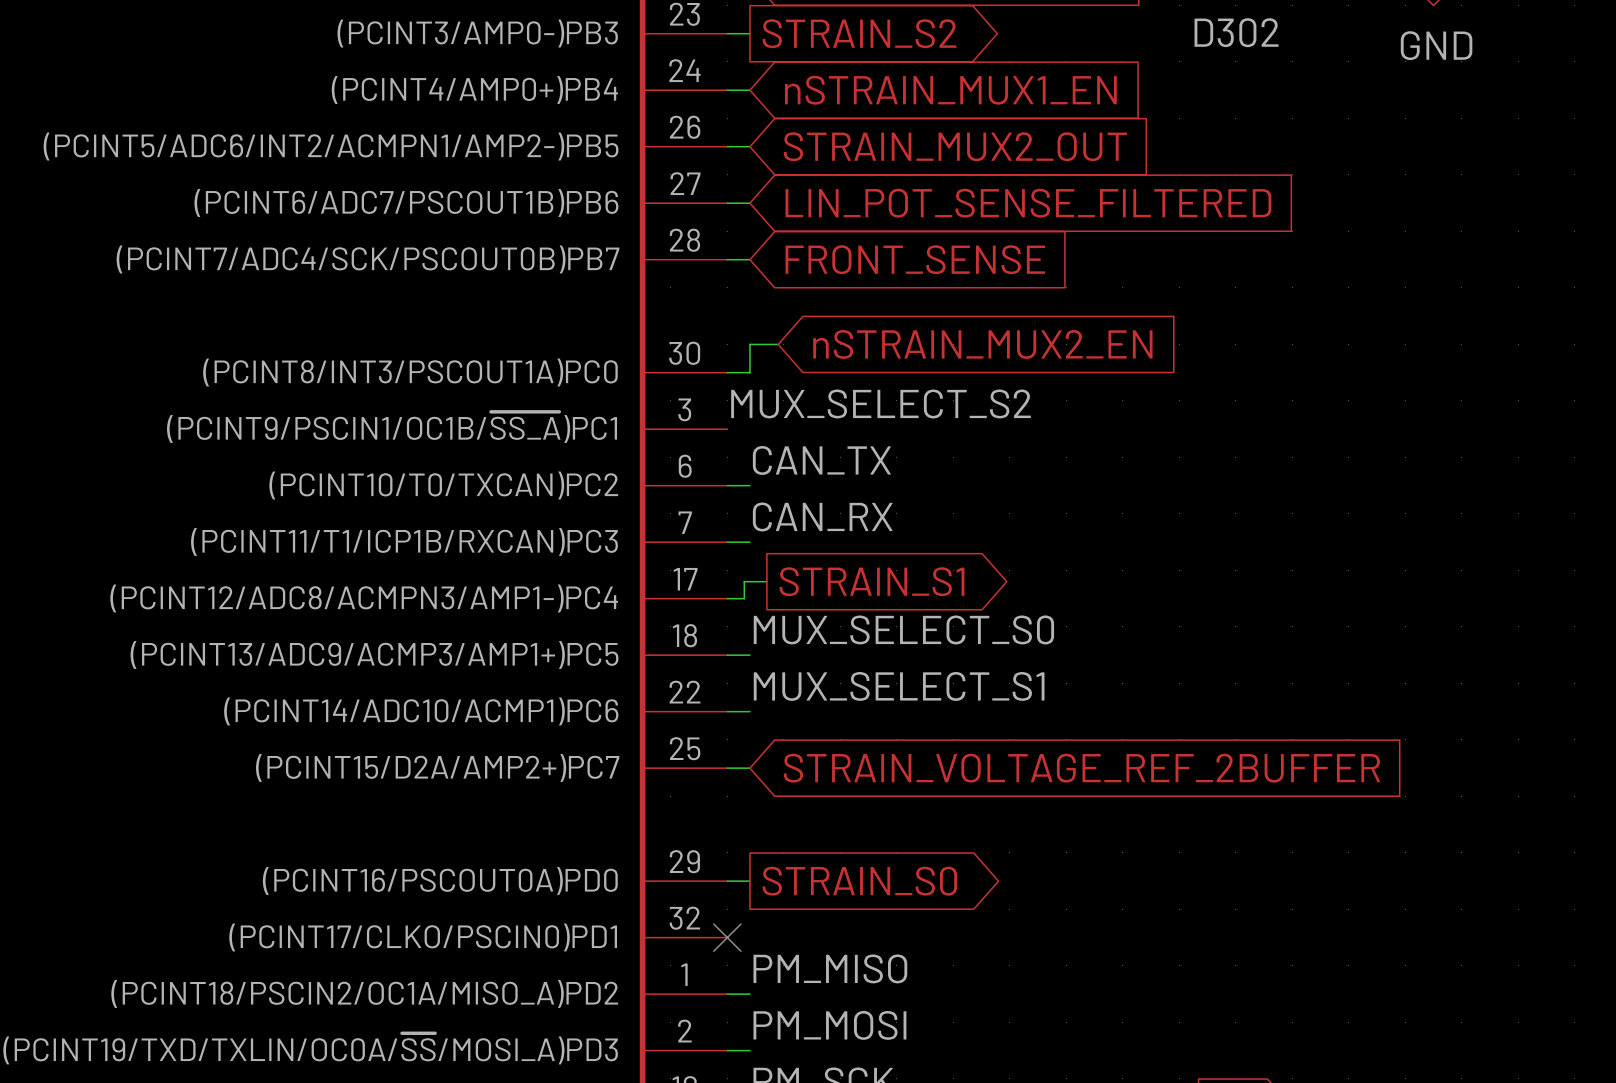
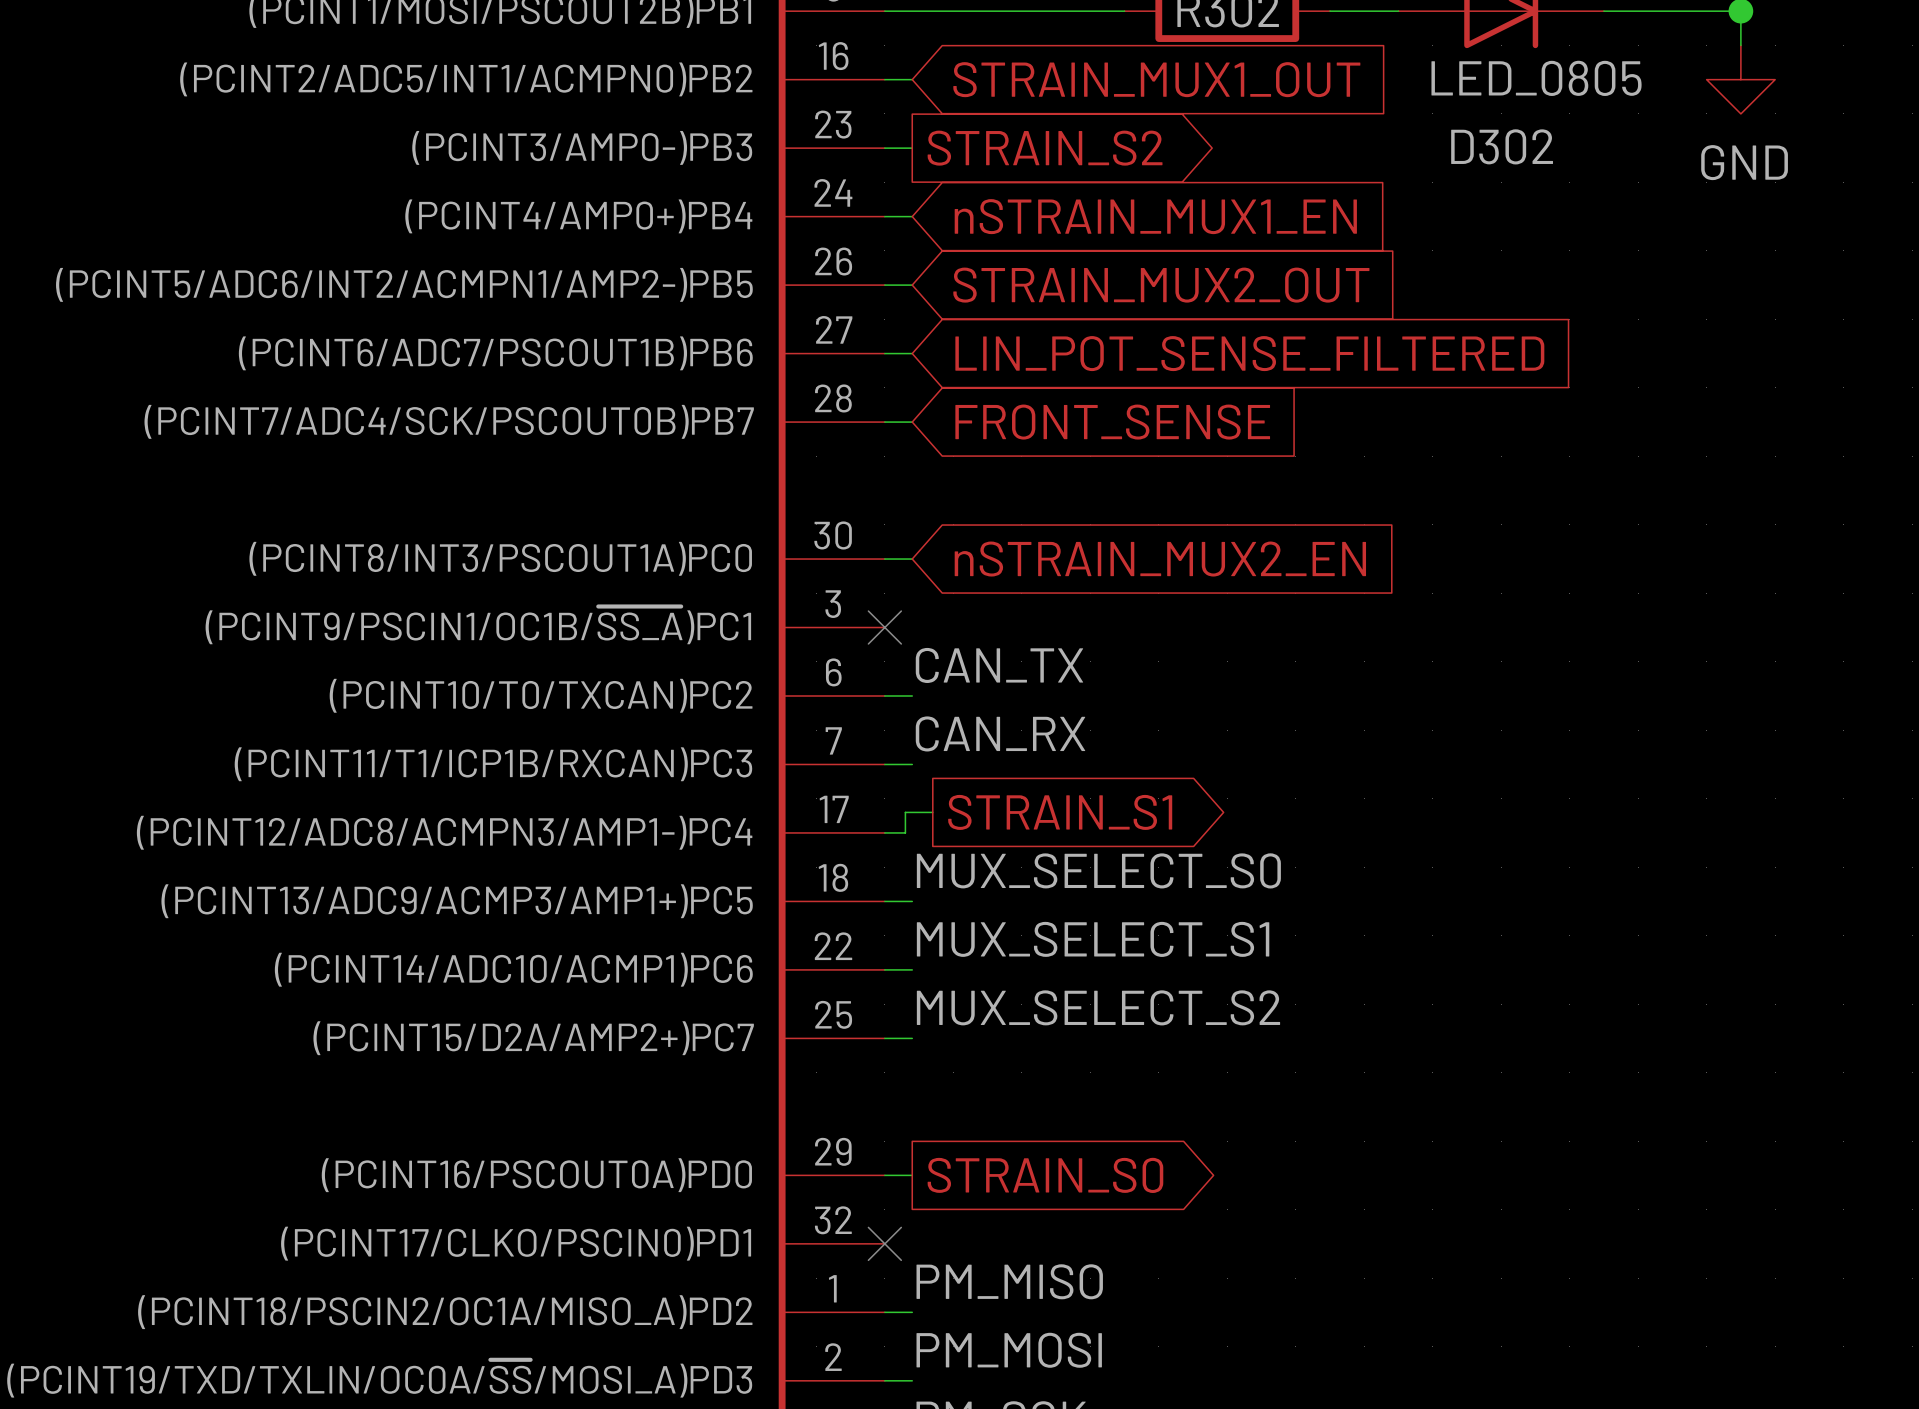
wire: (778, 344) (749, 344) (749, 372) -> none
global label position: nSTRAIN_MUX2_EN (982, 344) -> nSTRAIN_MUX2_EN (1160, 559)
label position: MUX_SELECT_S2 (880, 403) -> MUX_SELECT_S2 (1098, 1007)
no-connect mark: none -> (884, 627)
global label: STRAIN_VOLTAGE_REF_2BUFFER (1082, 768) -> none

